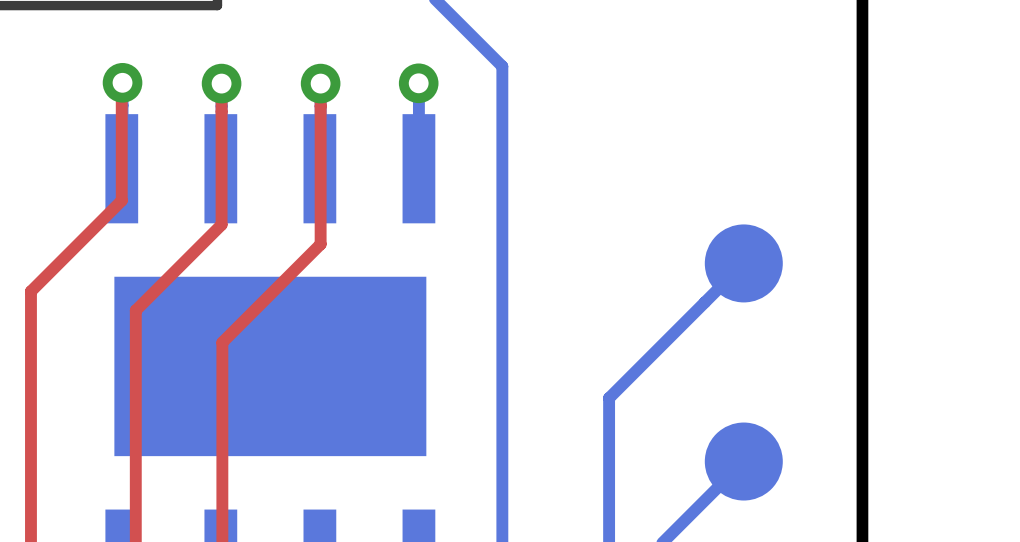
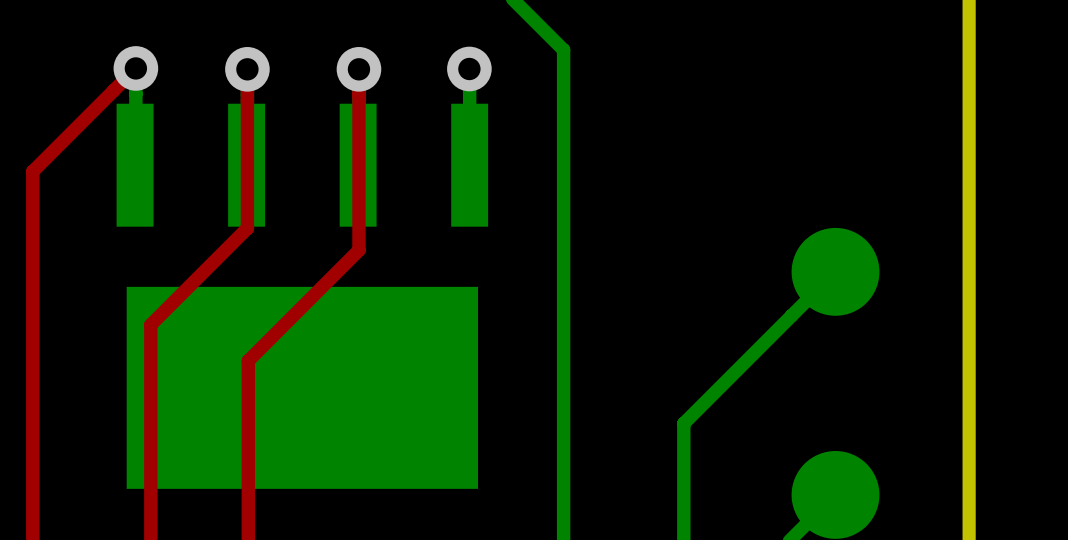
top track: (121, 83) (121, 200) (30, 291) -> (135, 69) (32, 171) (32, 303)

